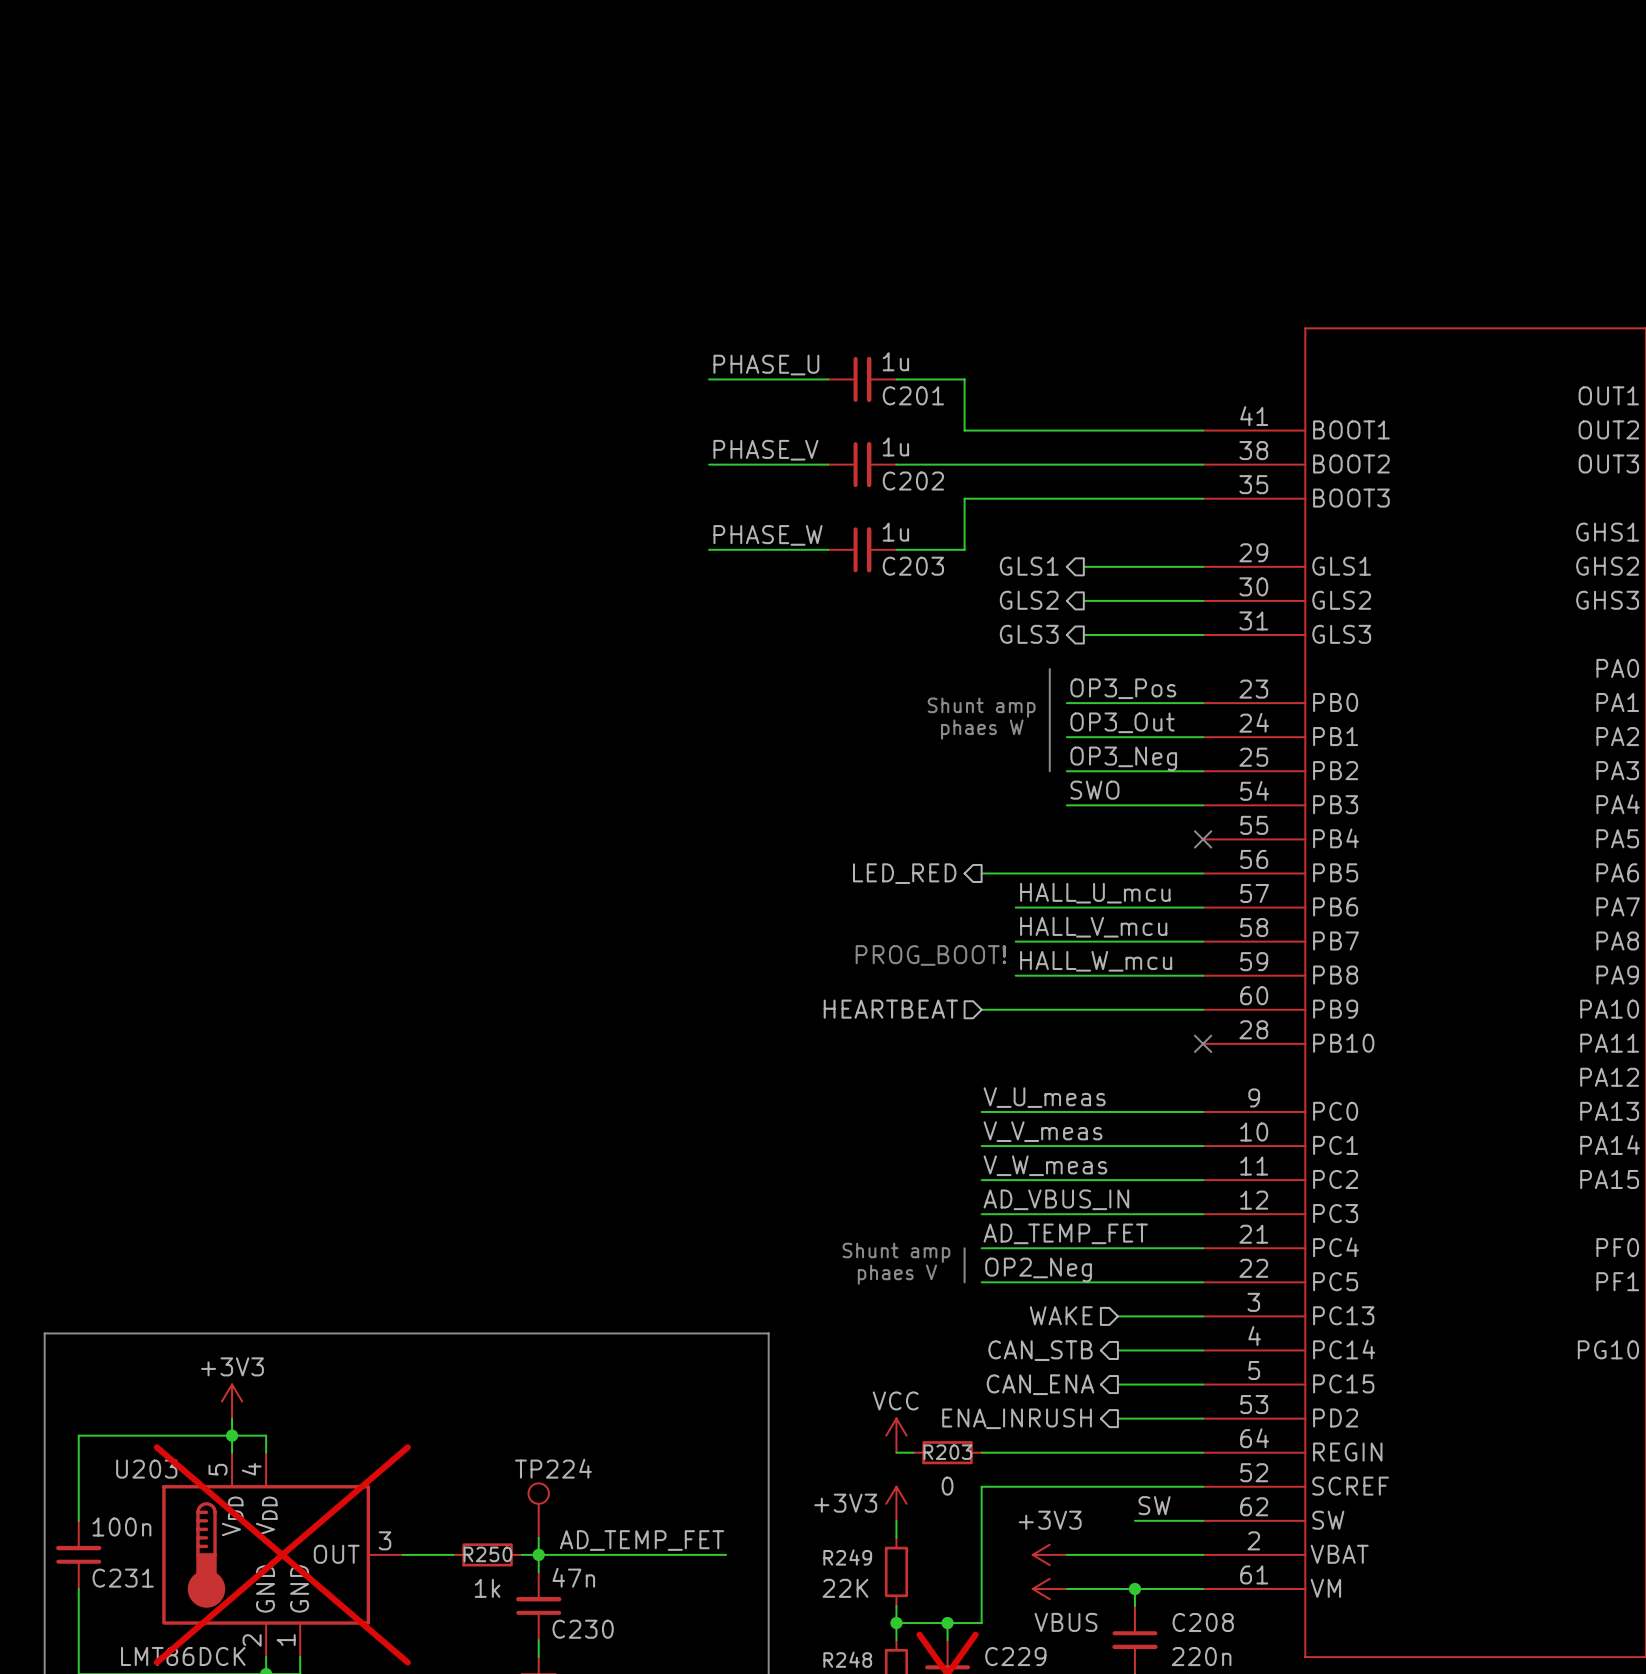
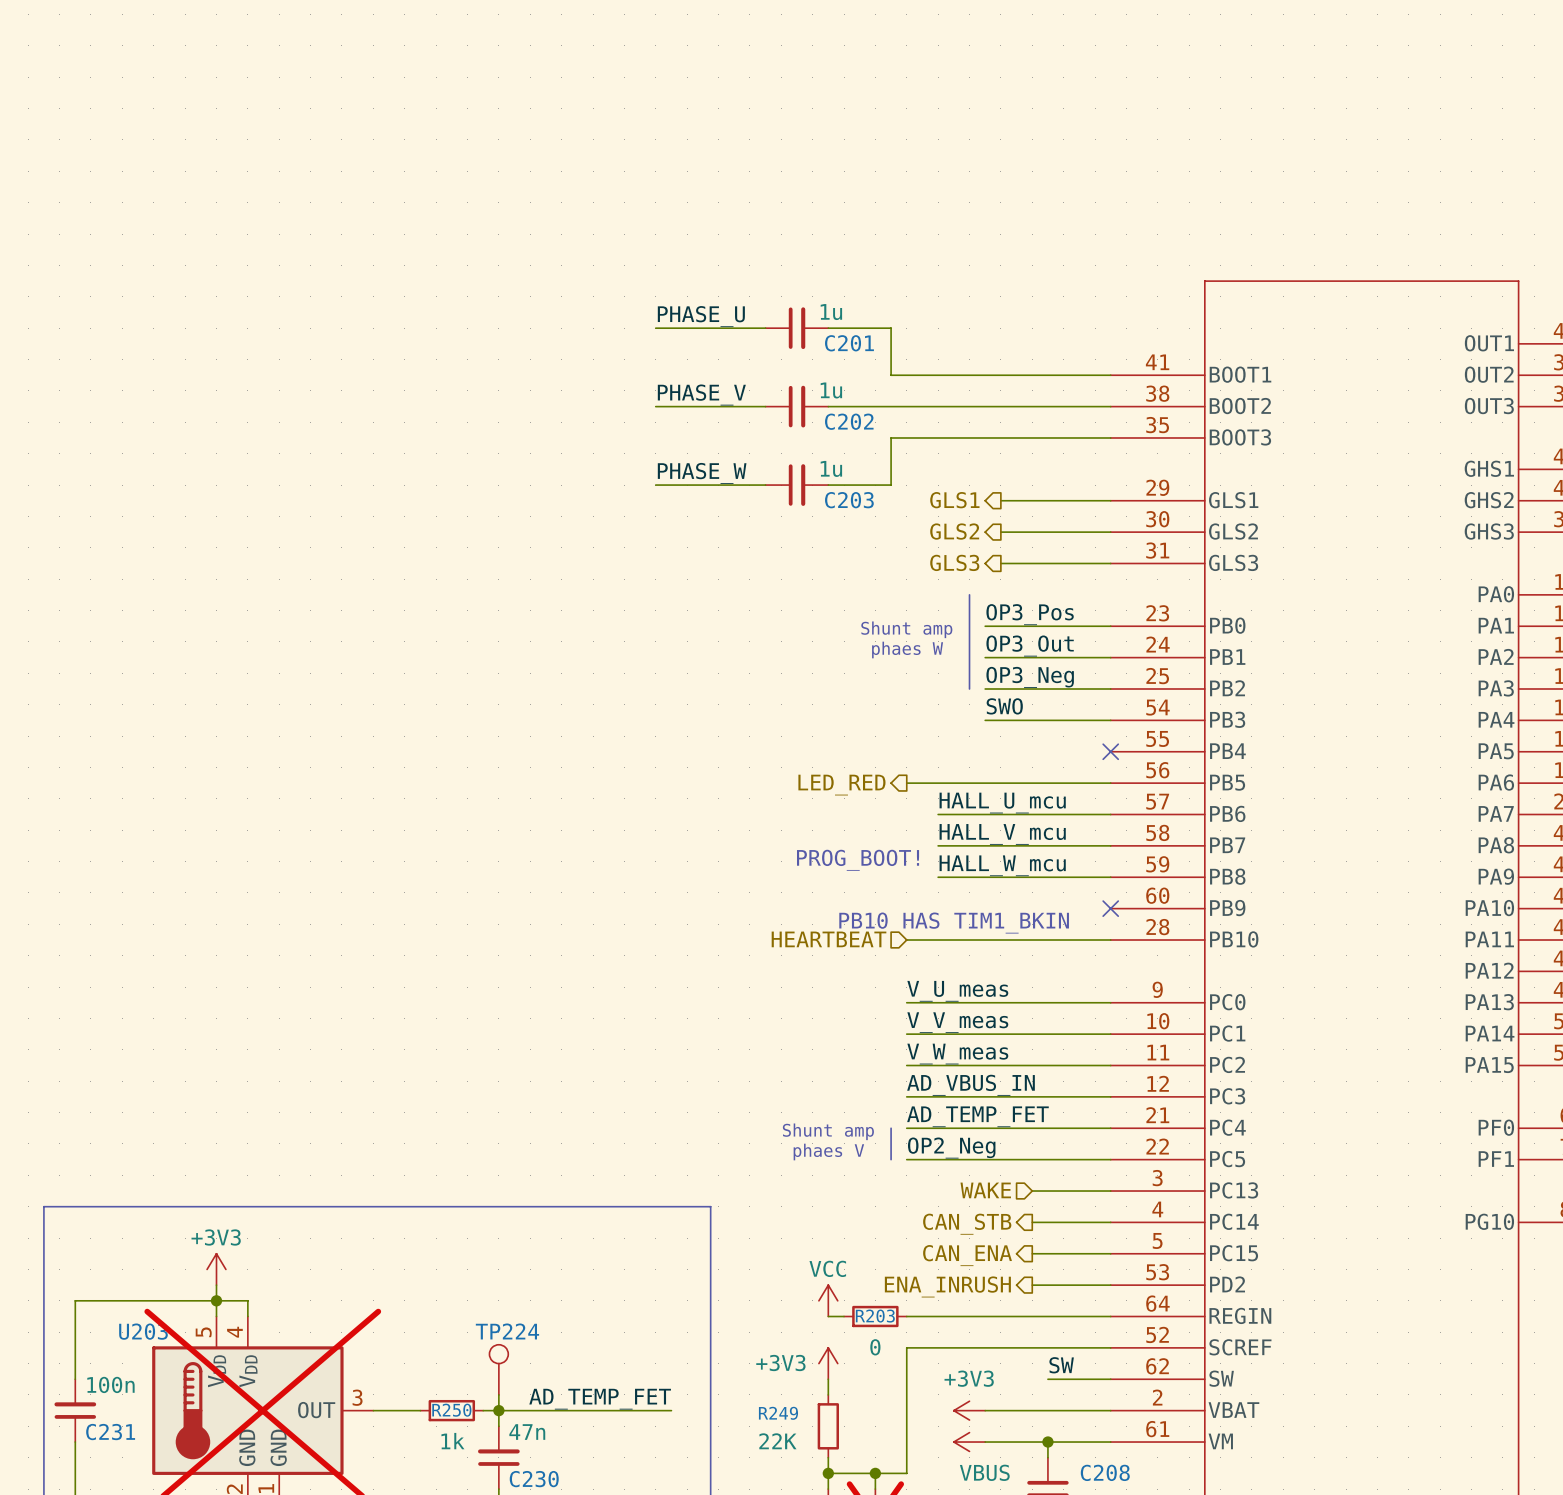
hierarchical label position: HEARTBEAT (890, 1009) -> HEARTBEAT (829, 939)
wire: (981, 1009) (1203, 1009) -> (906, 940) (1110, 940)
text: none -> PB10 HAS TIM1_BKIN (954, 923)
no-connect mark position: (1203, 1043) -> (1110, 908)

